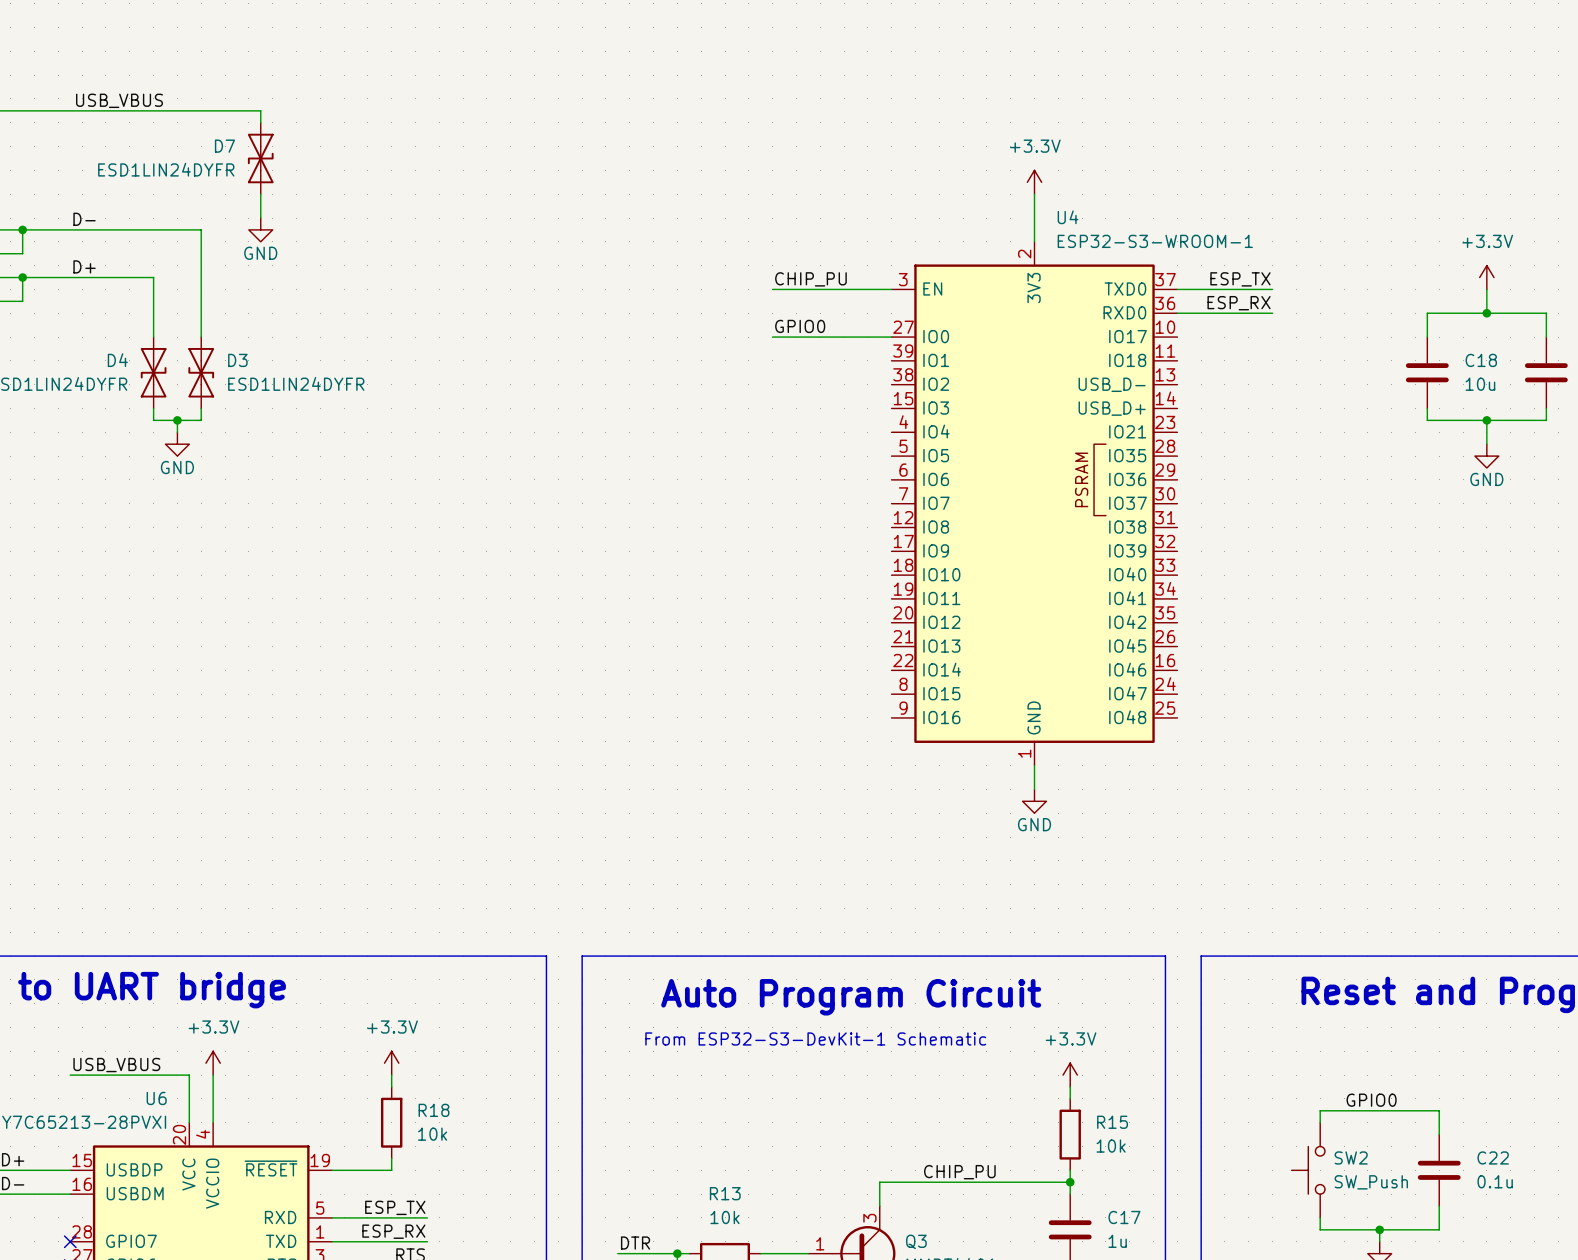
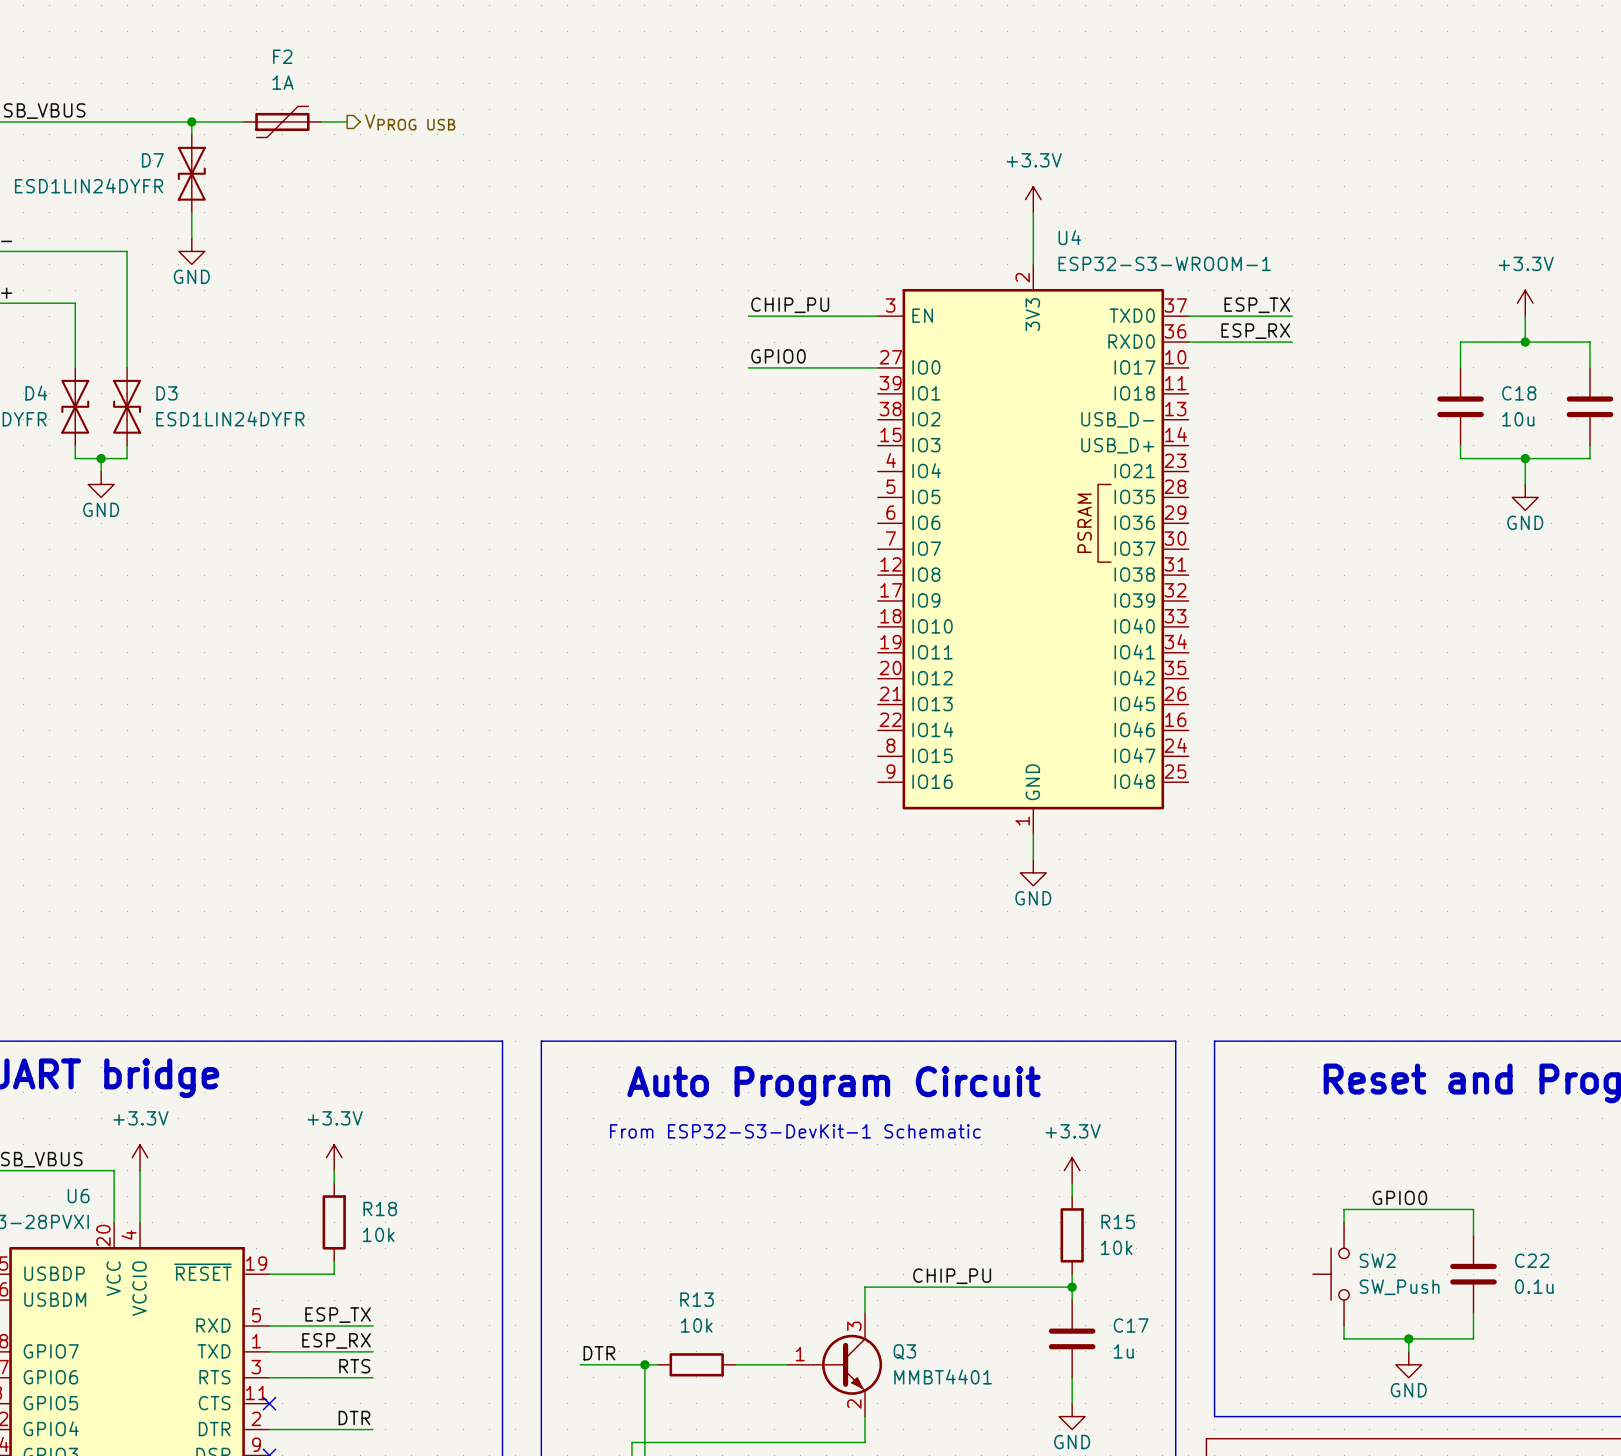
wire: none -> (191, 121) (243, 121)
junction: none -> (191, 121)
F2: none -> 1A (282, 121)
wire: none -> (321, 121) (347, 121)
hierarchical label: none -> VPROG USB (410, 122)

